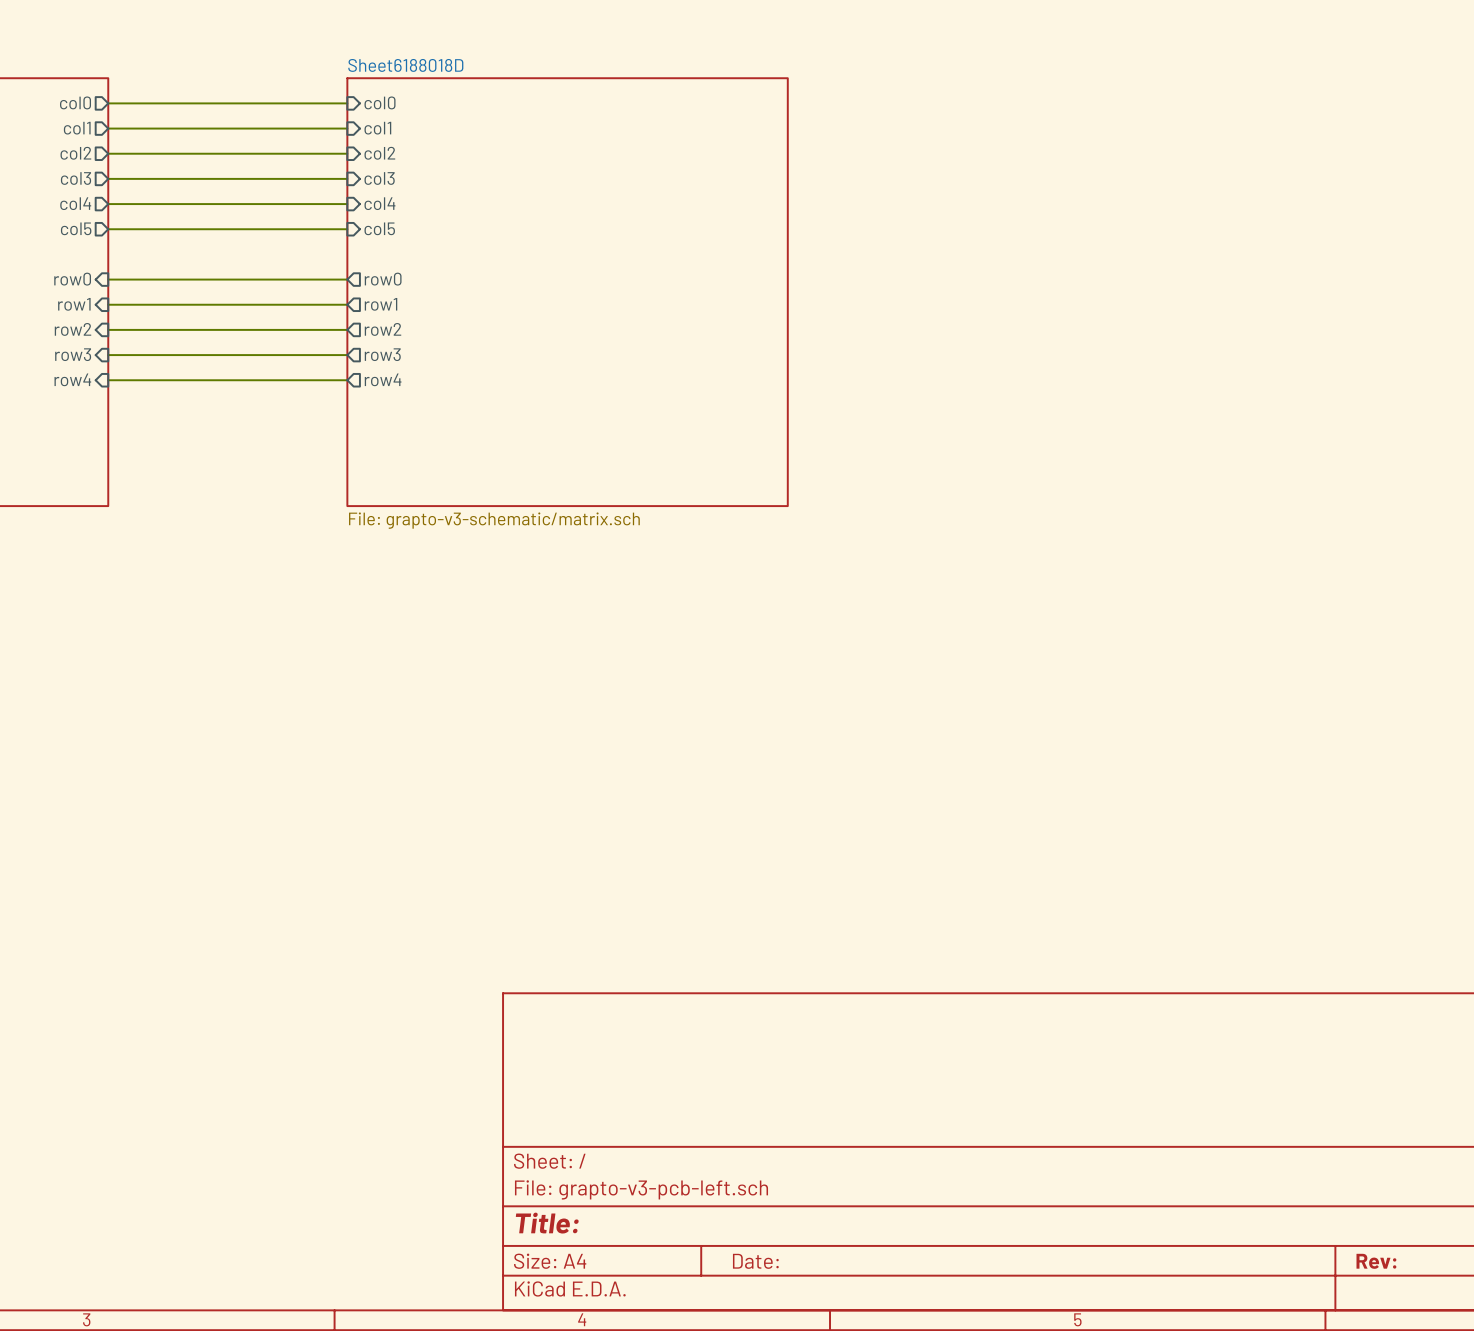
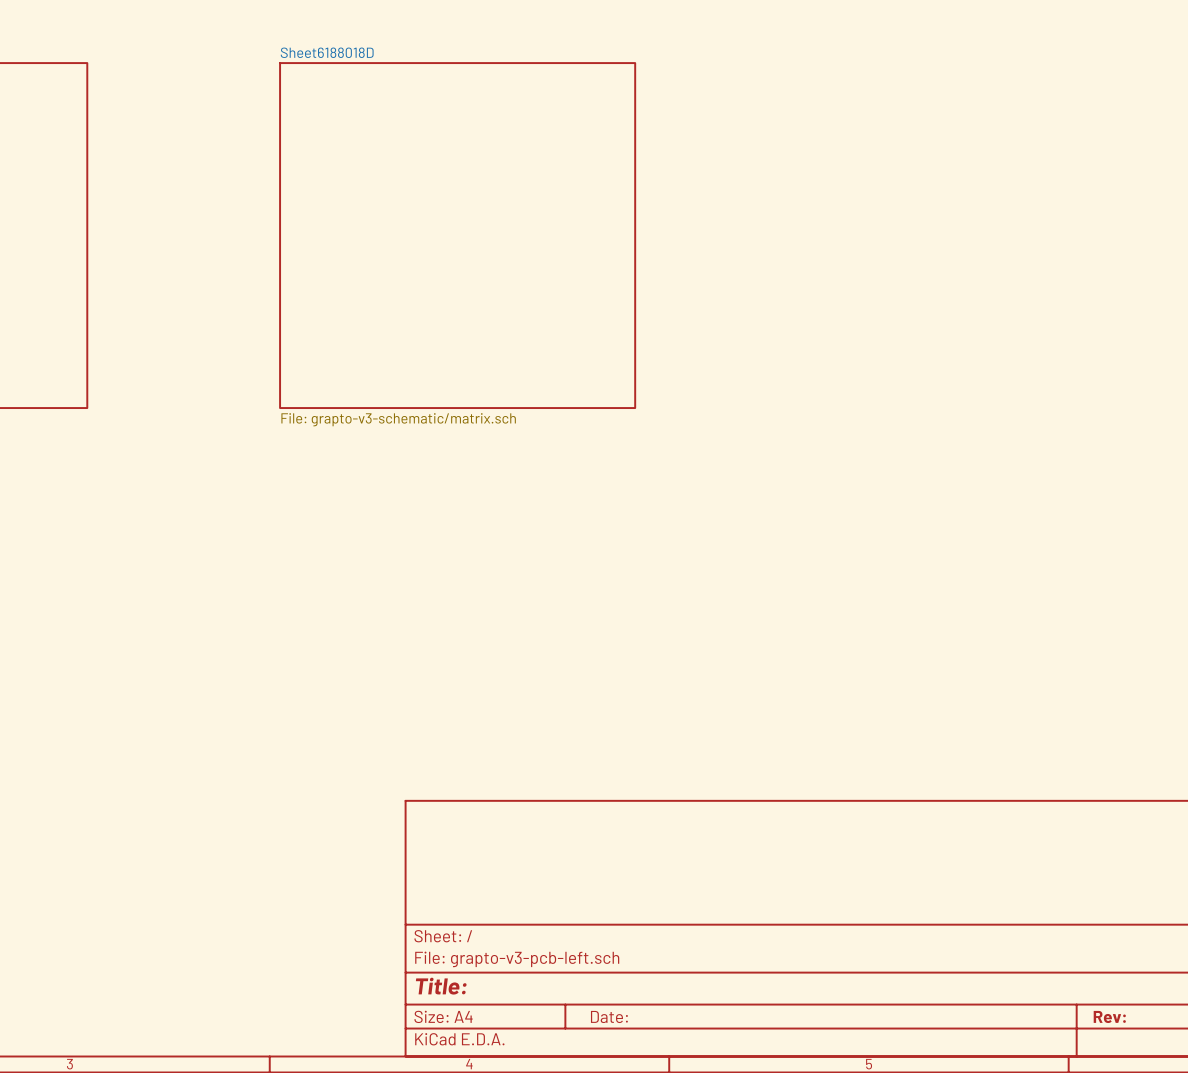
sheet pin: col0 (75, 102) -> none
sheet pin: col0 (380, 102) -> none
wire: (108, 103) (347, 103) -> none
sheet pin: col1 (77, 128) -> none
wire: (108, 128) (347, 128) -> none
sheet pin: col1 (377, 128) -> none
sheet pin: col2 (75, 153) -> none
wire: (108, 153) (347, 153) -> none
sheet pin: col2 (379, 153) -> none
sheet pin: col3 (76, 178) -> none
wire: (108, 178) (347, 178) -> none
sheet pin: col3 (379, 178) -> none
sheet pin: col4 (75, 203) -> none
sheet pin: col4 (379, 203) -> none
wire: (108, 204) (347, 204) -> none
sheet pin: col5 (76, 228) -> none
sheet pin: col5 (379, 228) -> none
wire: (108, 229) (347, 229) -> none
sheet pin: row0 (72, 279) -> none
wire: (108, 279) (347, 279) -> none
sheet pin: row0 (383, 279) -> none
sheet pin: row1 (74, 304) -> none
wire: (108, 304) (347, 304) -> none
sheet pin: row1 (381, 304) -> none
sheet pin: row2 (73, 329) -> none
wire: (108, 329) (347, 329) -> none
sheet pin: row2 (383, 329) -> none
sheet pin: row3 (73, 354) -> none
sheet pin: row3 (382, 354) -> none
wire: (108, 355) (347, 355) -> none
sheet pin: row4 (72, 379) -> none
sheet pin: row4 (383, 379) -> none
wire: (108, 380) (347, 380) -> none

